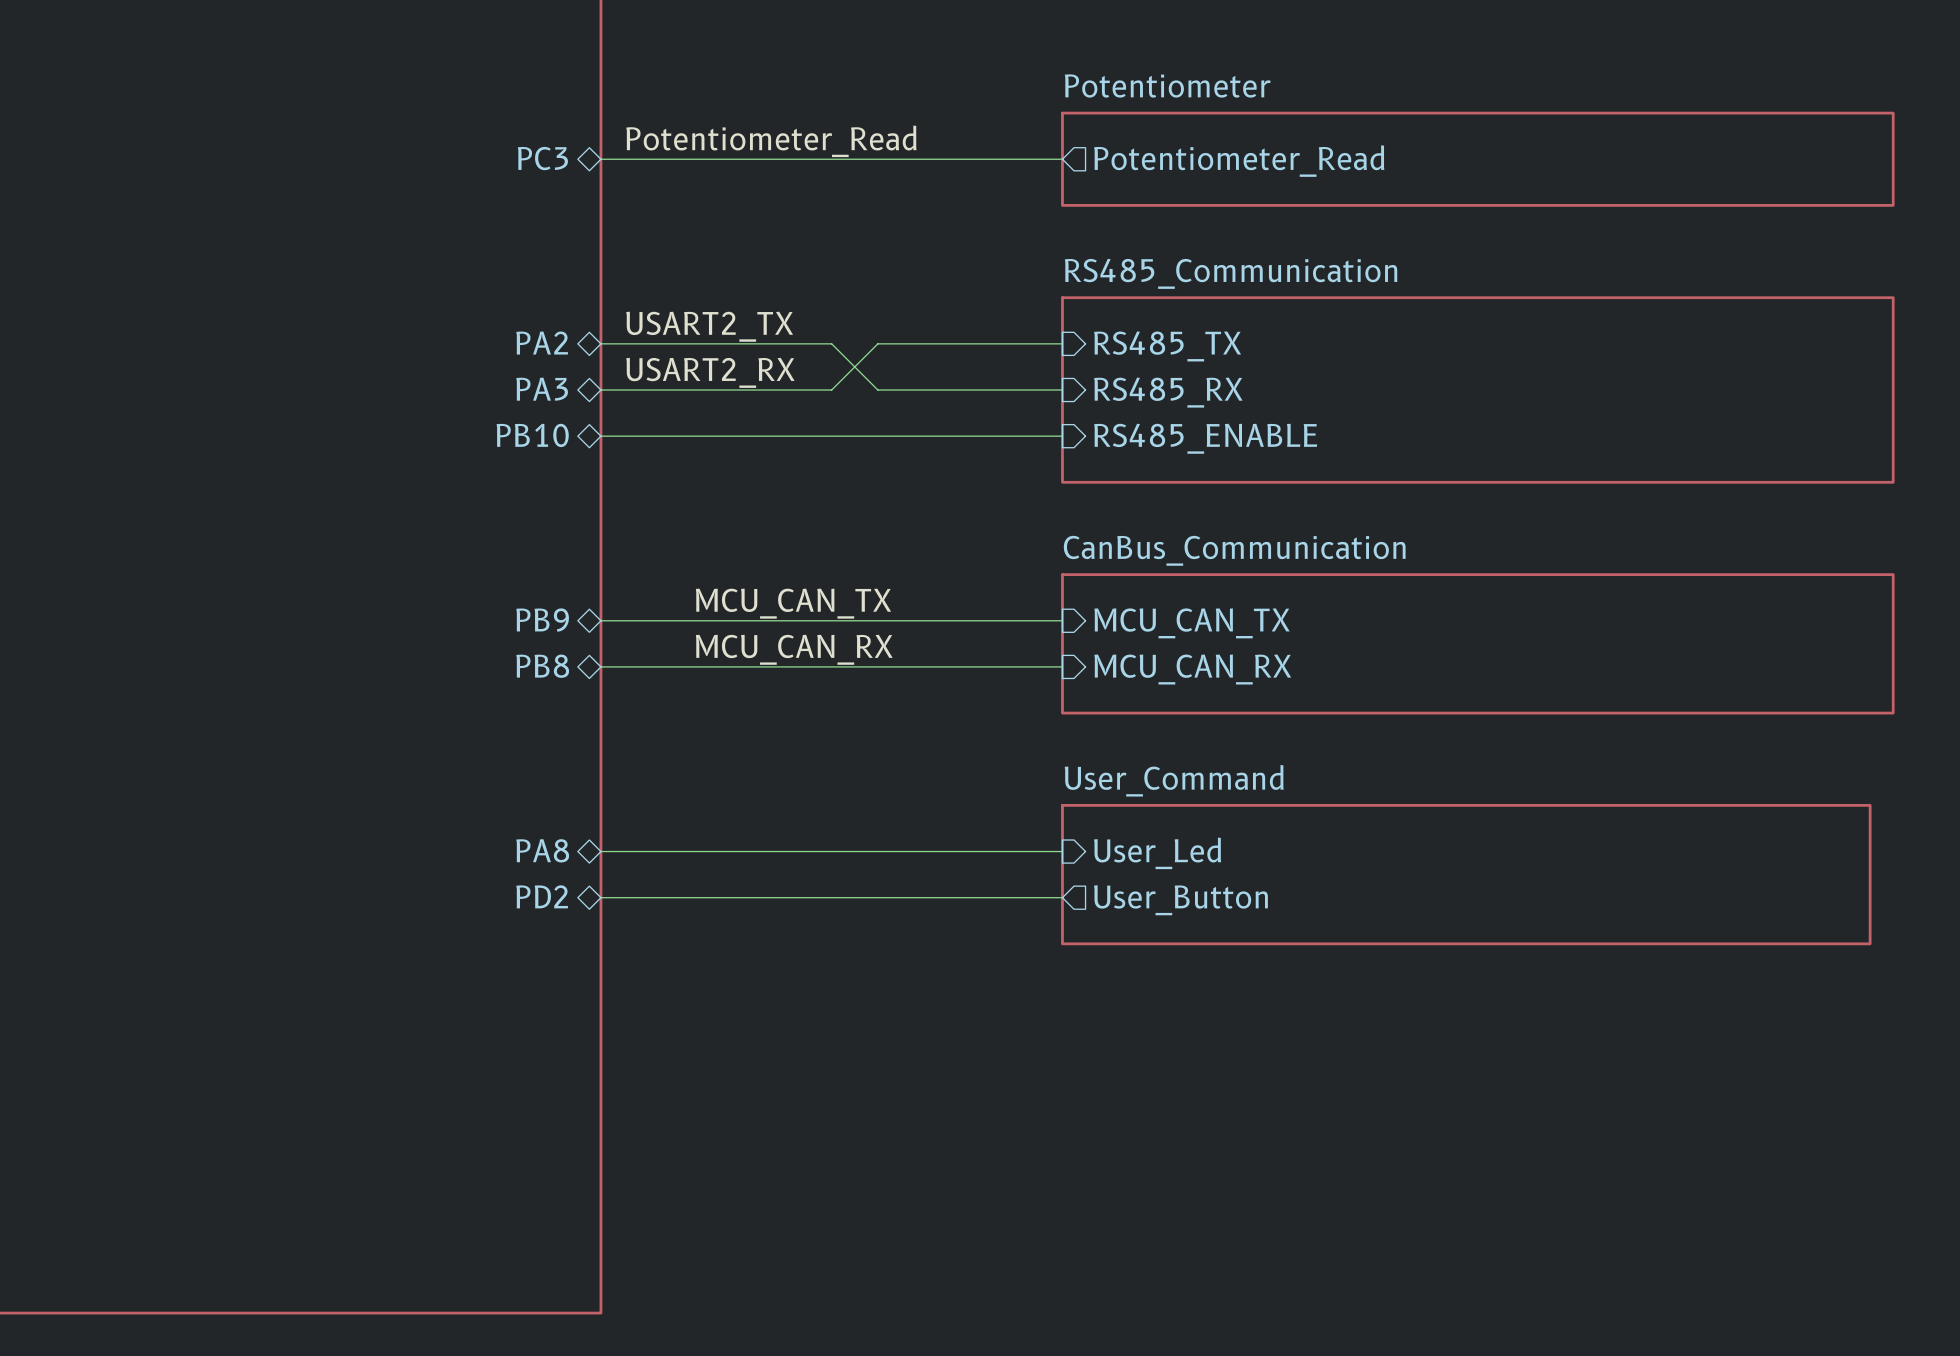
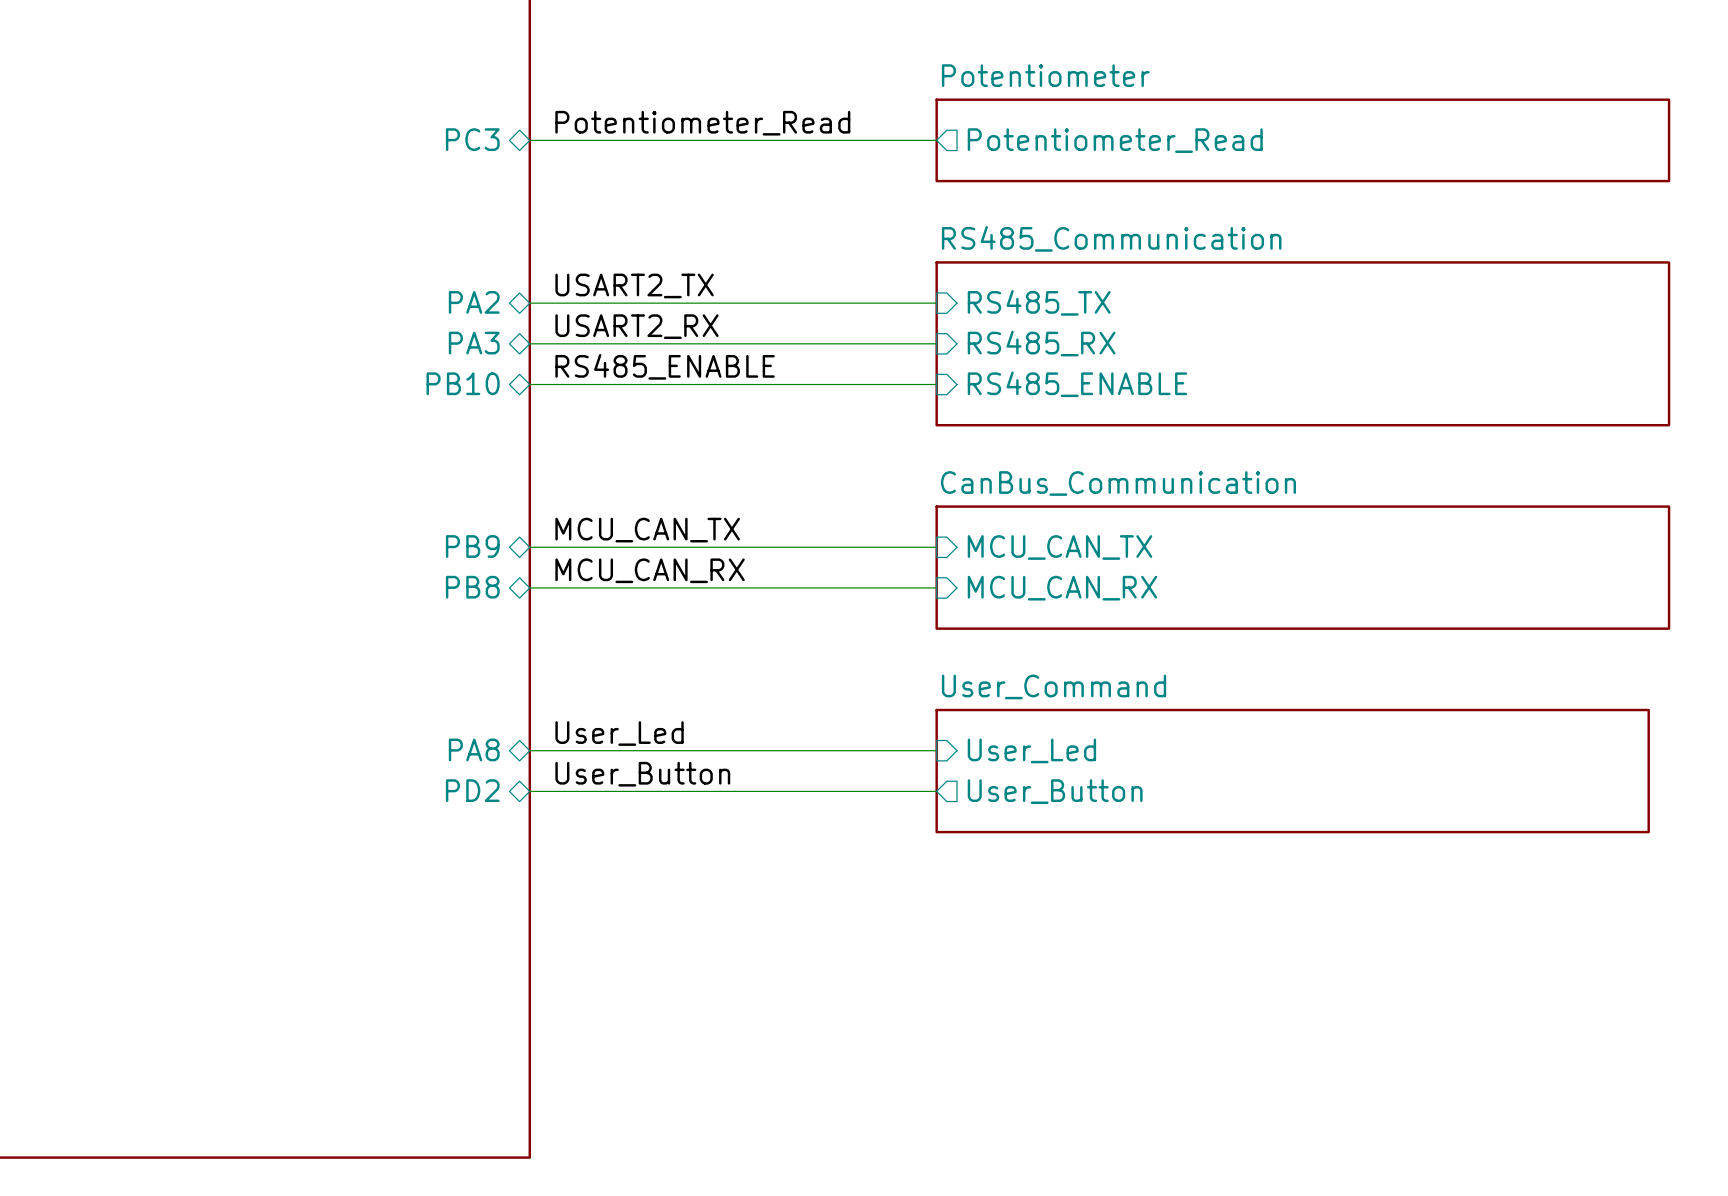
wire: (831, 343) (877, 390) -> (733, 303) (773, 303)
wire: (877, 343) (831, 390) -> (773, 343) (733, 343)
label: none -> RS485_ENABLE (665, 366)
label position: MCU_CAN_TX (793, 603) -> MCU_CAN_TX (647, 530)
label position: MCU_CAN_RX (794, 649) -> MCU_CAN_RX (650, 570)
label: none -> User_Led (619, 733)
label: none -> User_Button (642, 774)

